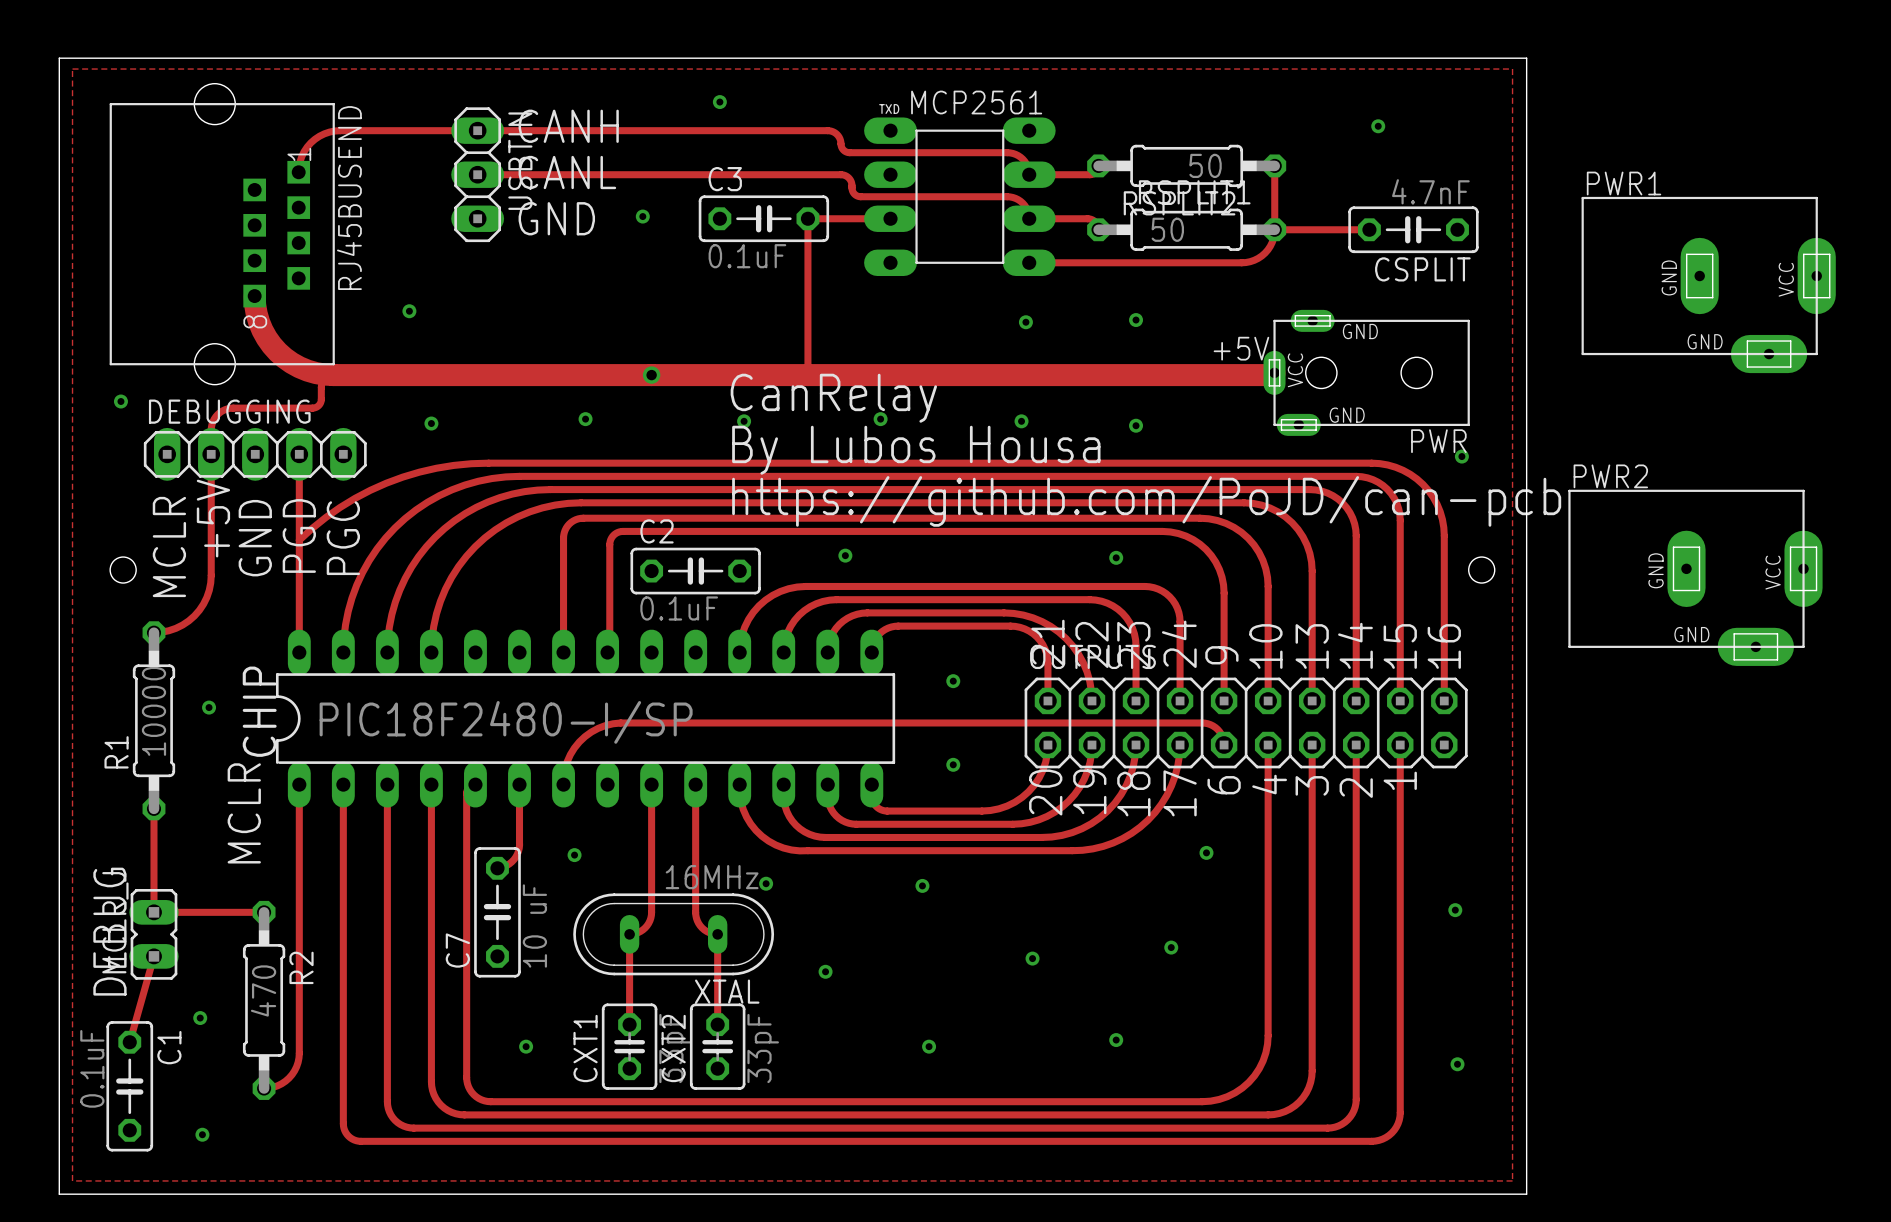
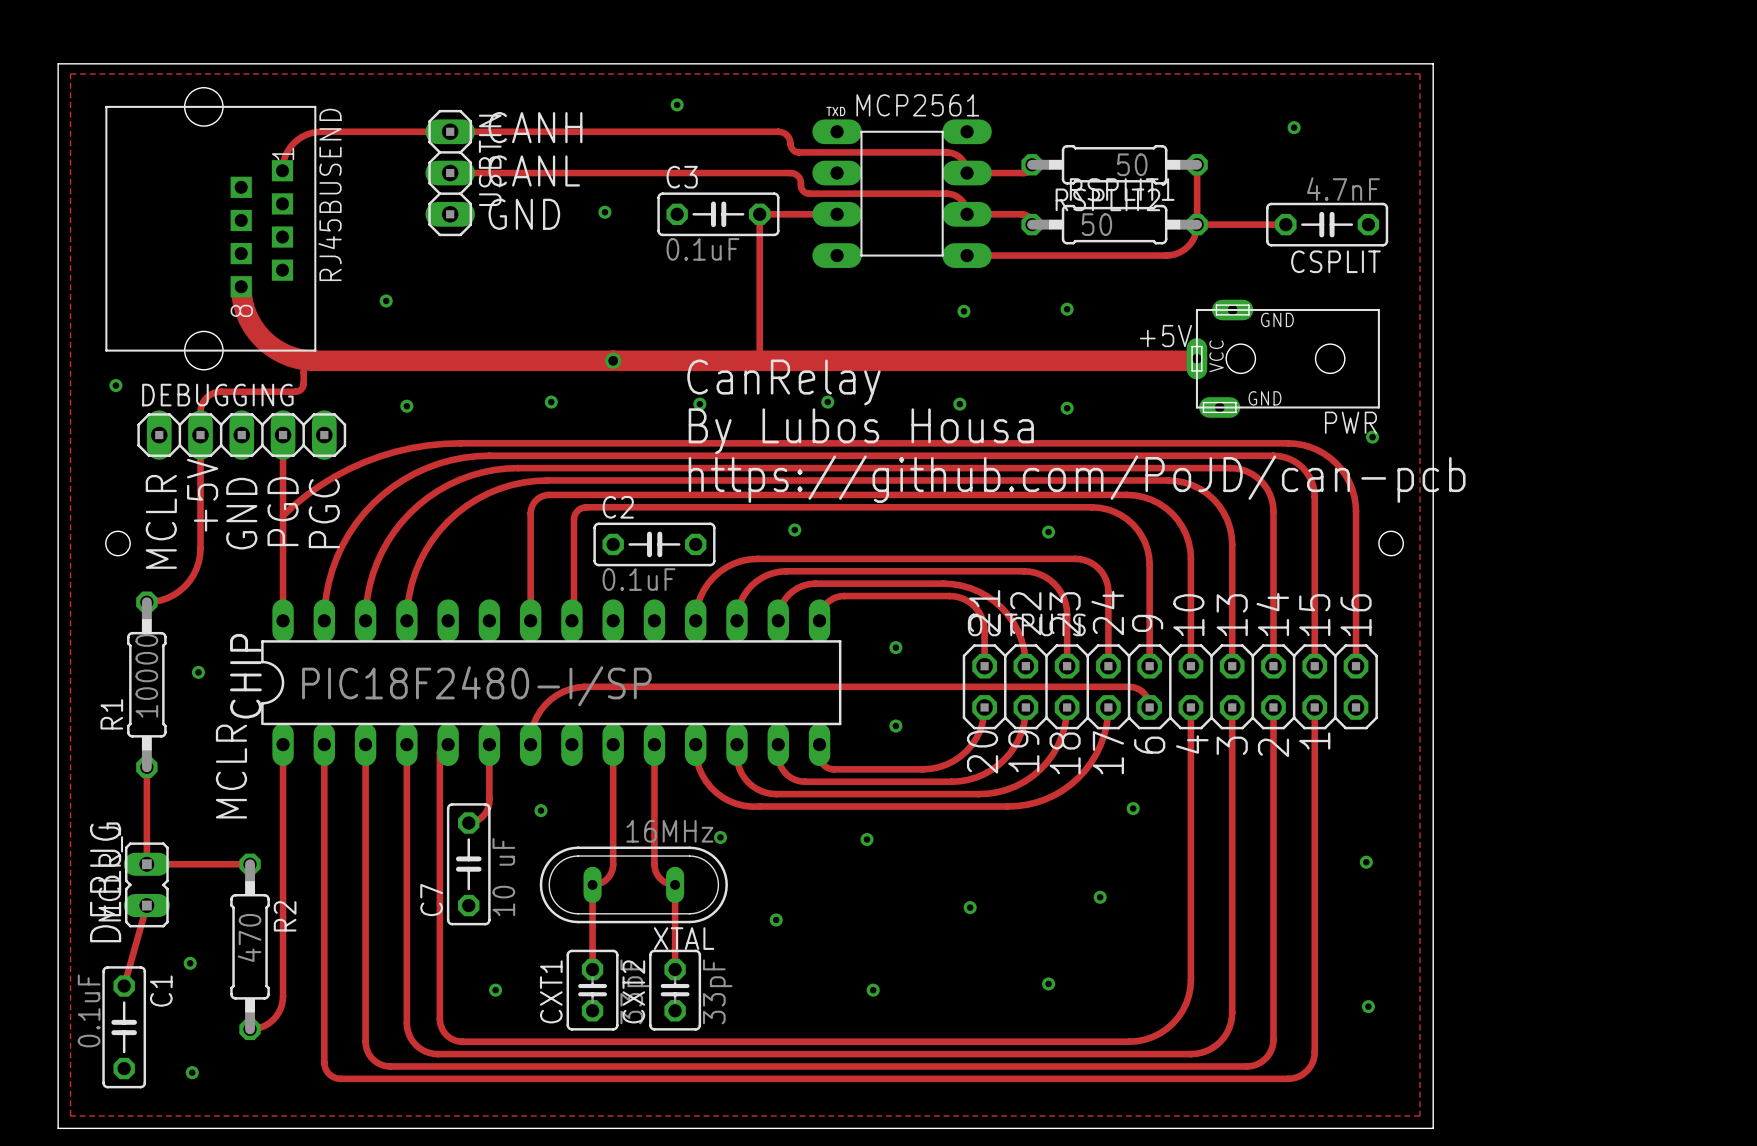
PWR1: (1708, 284) -> none
PWR2: (1695, 577) -> none

